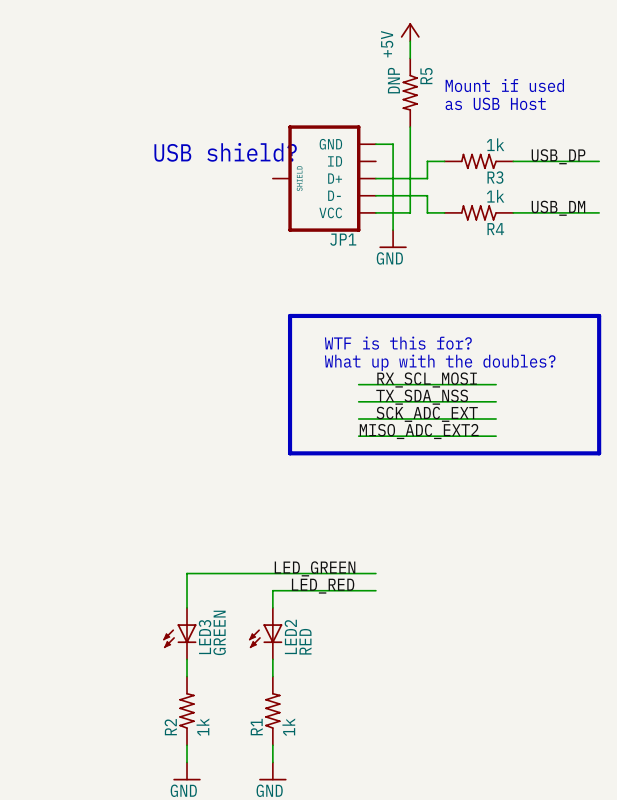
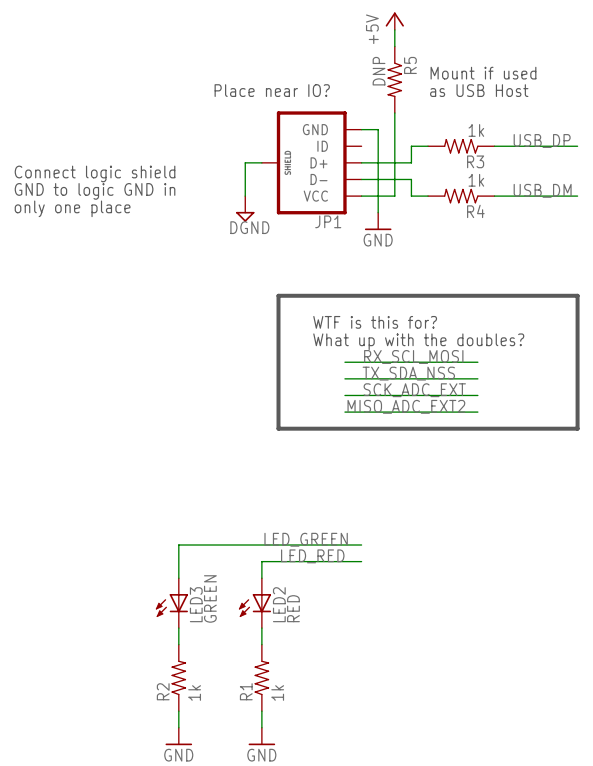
text: none -> Place near IO? (272, 90)
text: USB shield? (225, 152) -> none
wire: none -> (261, 162) (245, 162) (245, 196)
text: none -> Connect logic shield (95, 173)
text: none -> GND to logic GND in (95, 191)
text: none -> only one place (72, 208)
power symbol: none -> DGND (245, 208)

